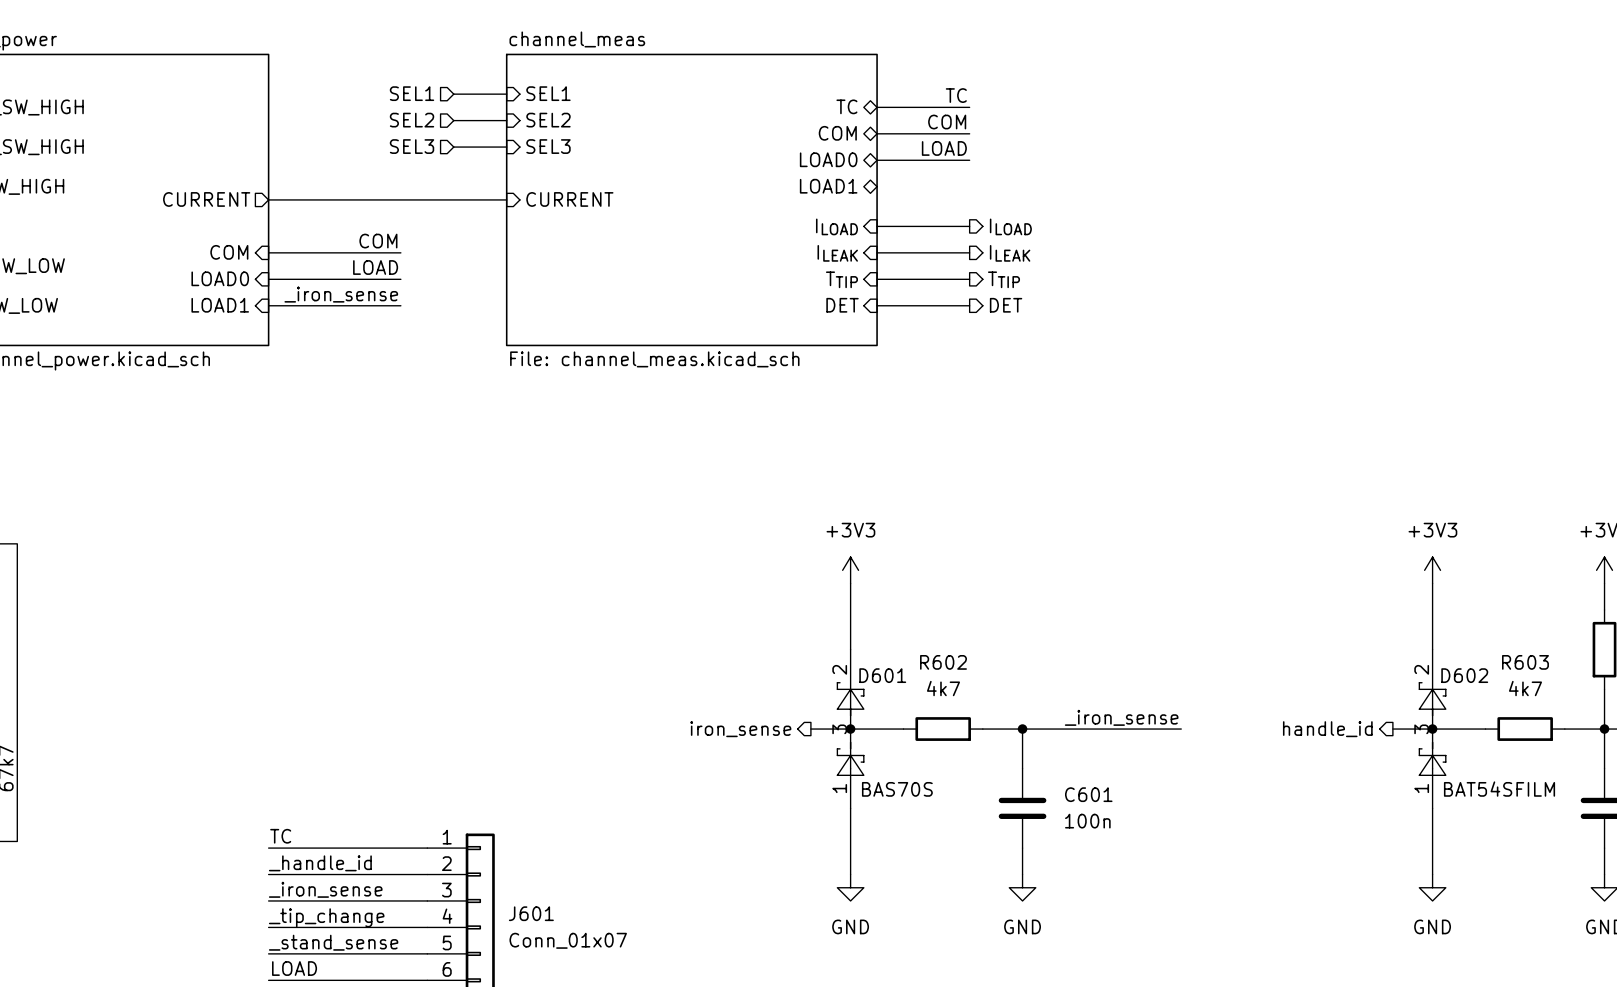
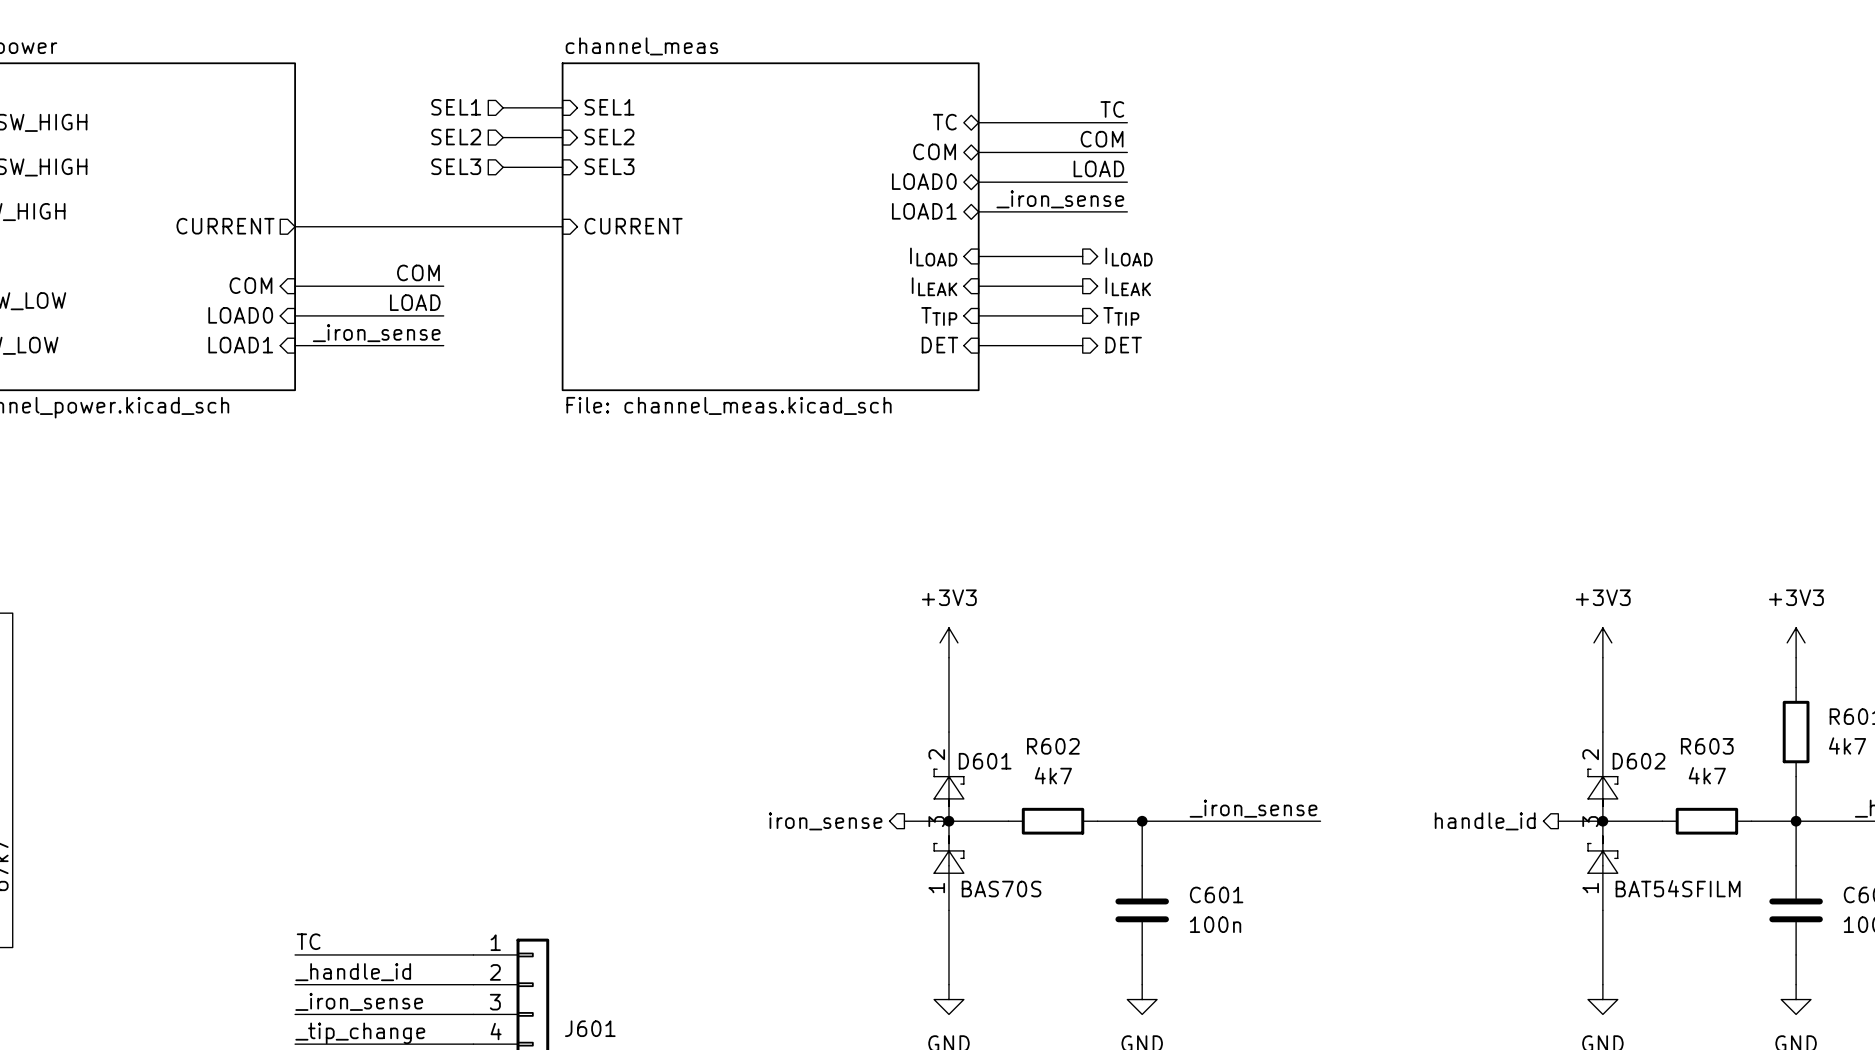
label position: TC (956, 95) -> TC (1112, 109)
wire: none -> (1082, 122) (1127, 122)
label position: COM (947, 122) -> COM (1102, 139)
wire: none -> (1082, 152) (1127, 152)
label position: LOAD (944, 148) -> LOAD (1098, 168)
wire: none -> (1082, 182) (1127, 182)
label: none -> _iron_sense (1060, 199)
wire: none -> (978, 211) (1127, 211)

